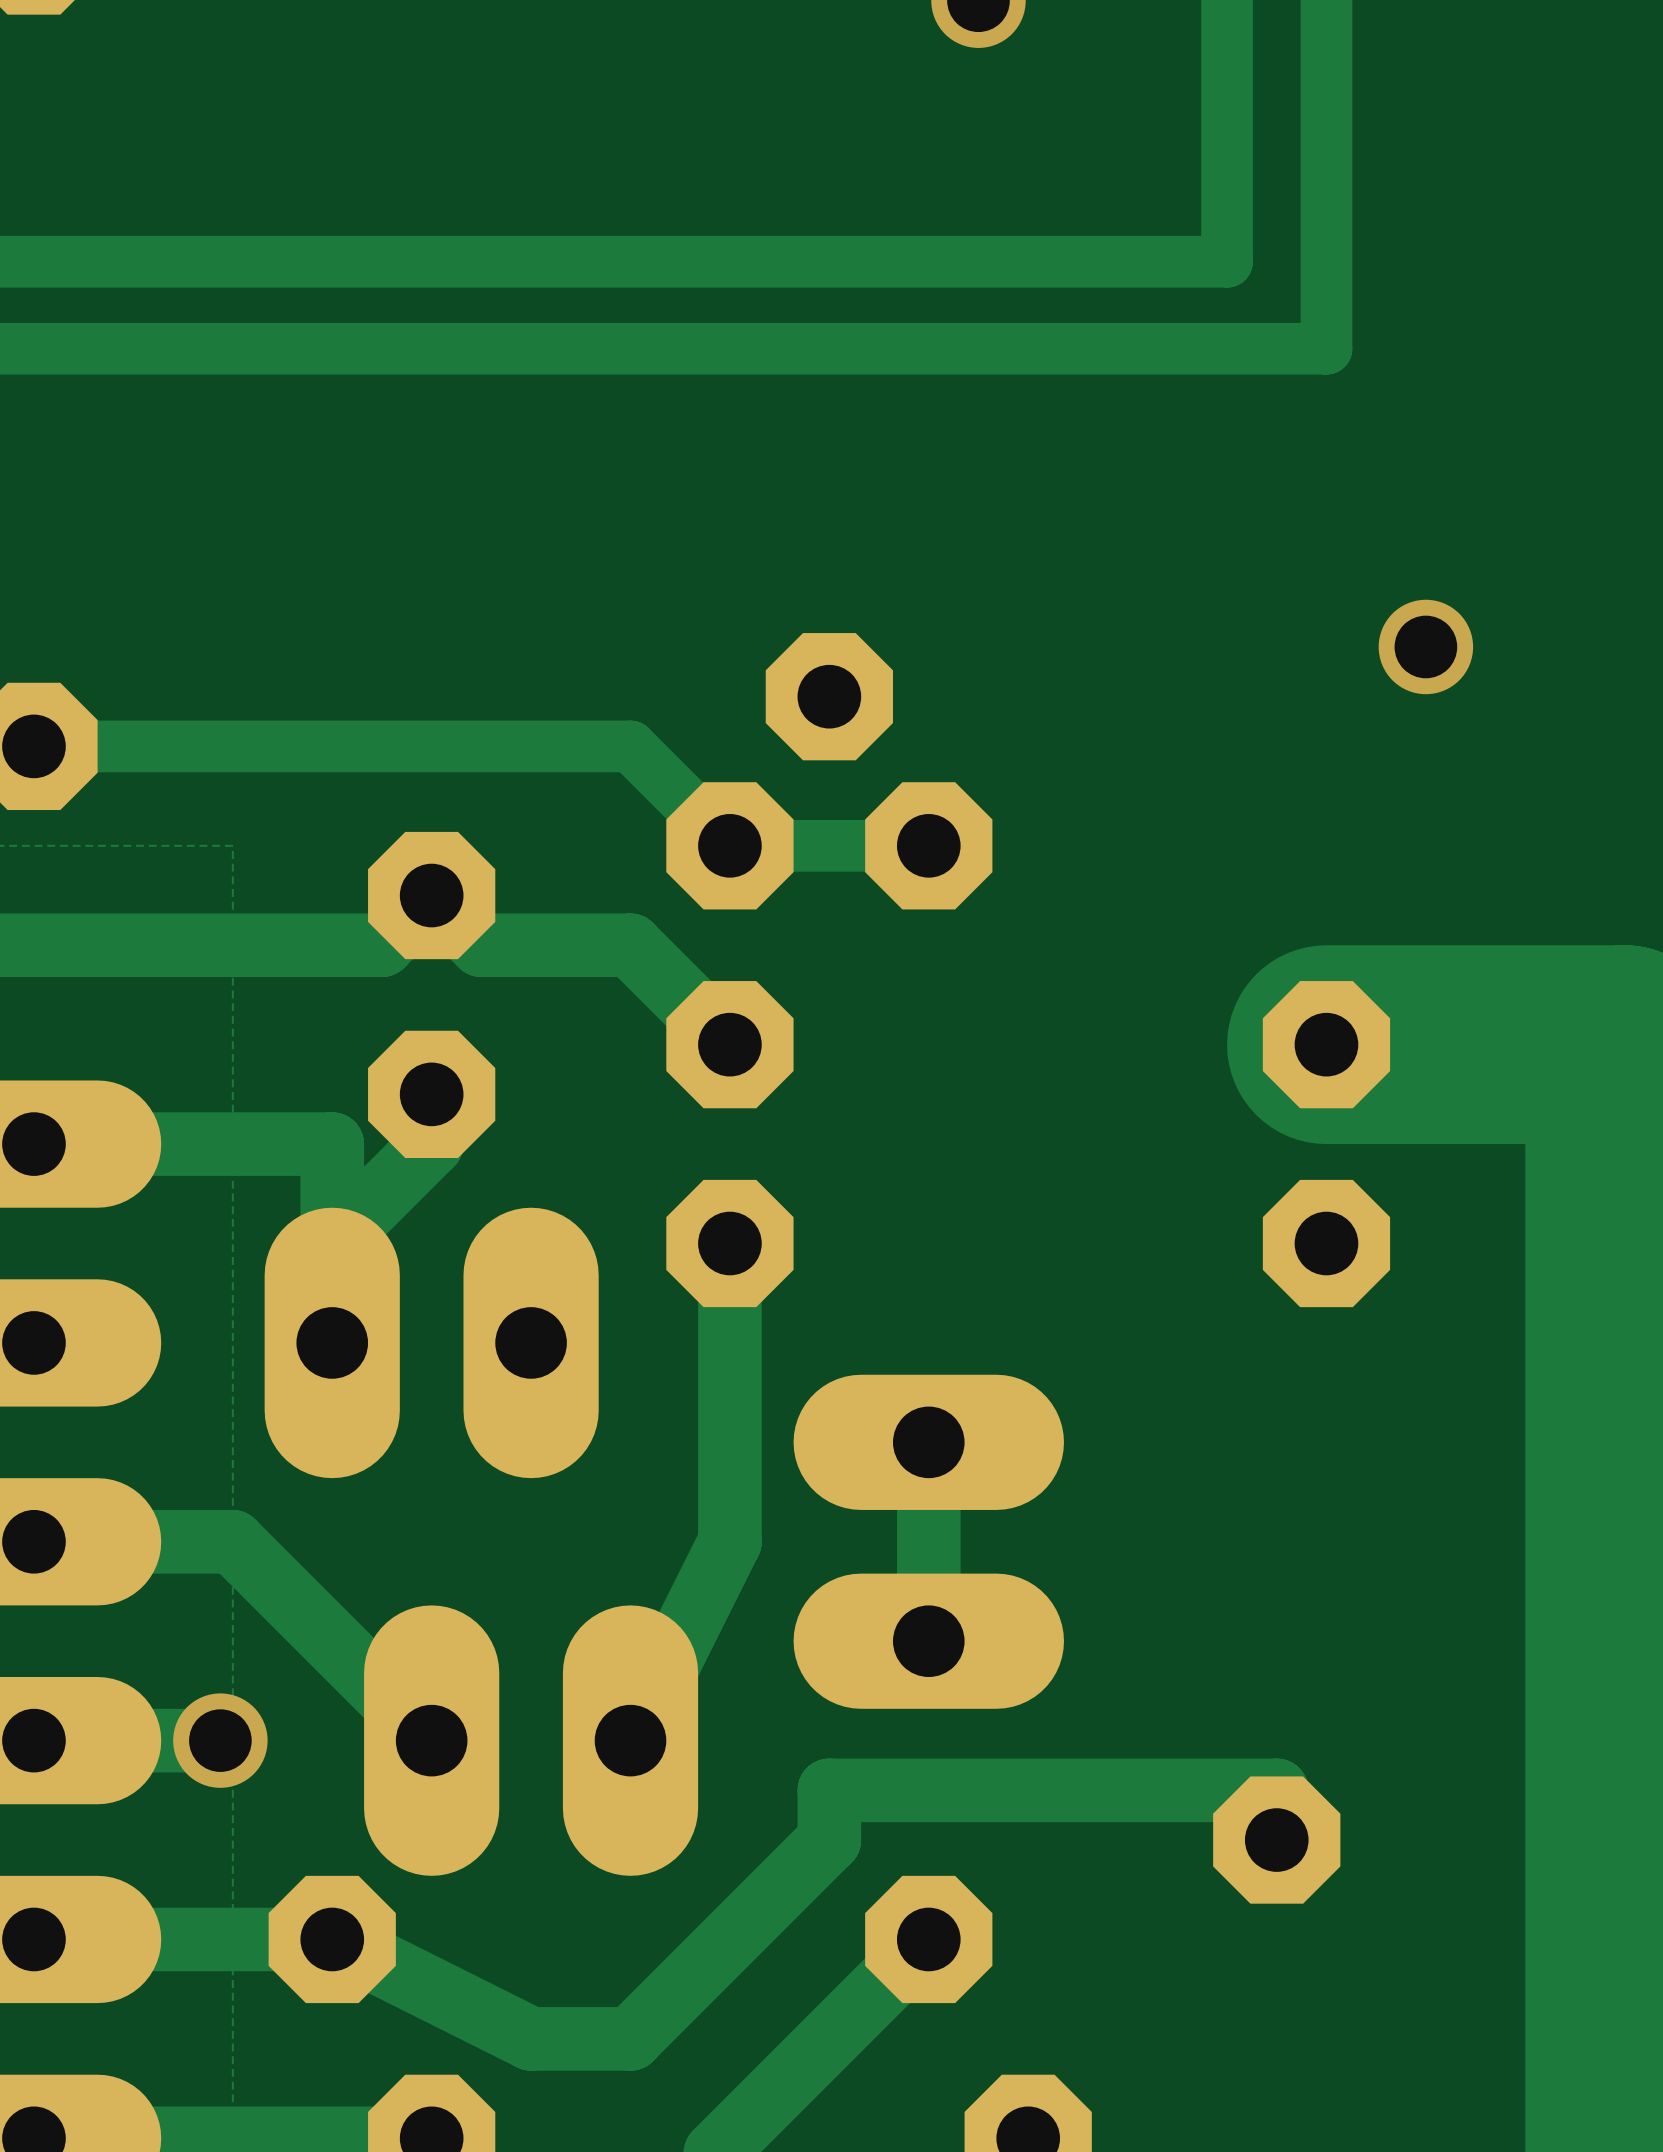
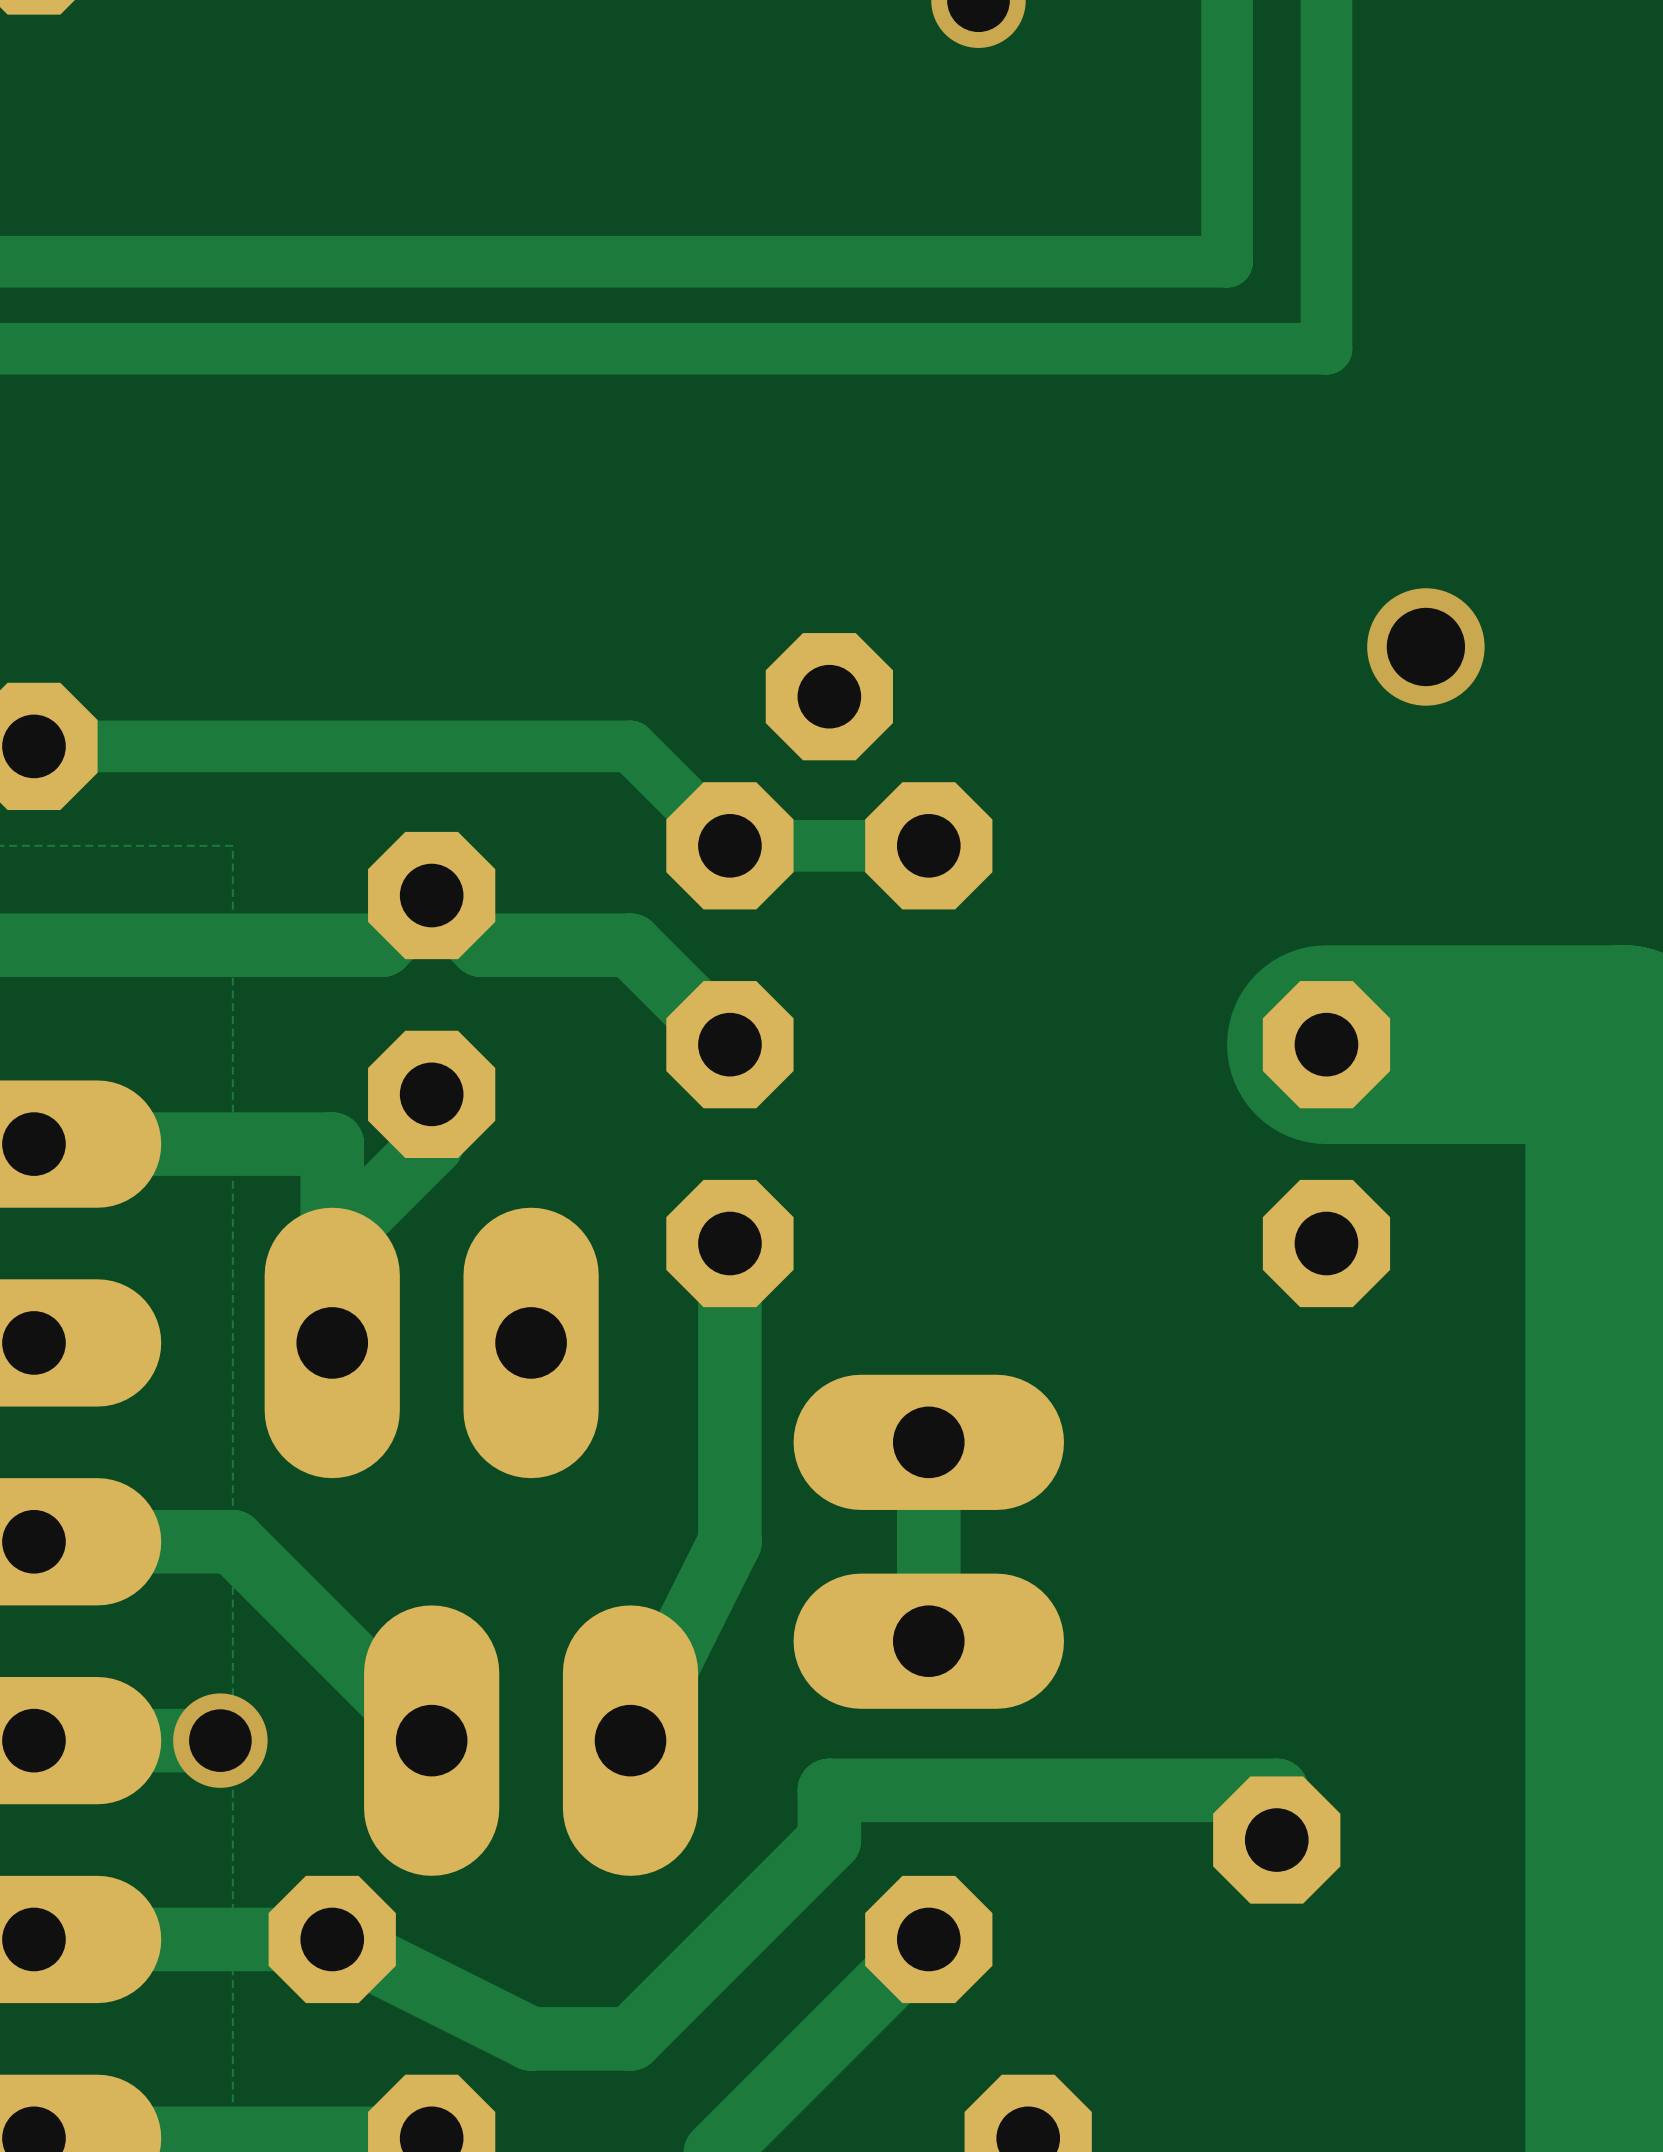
via size: [1378, 599, 1474, 695] -> [1367, 588, 1485, 706]

